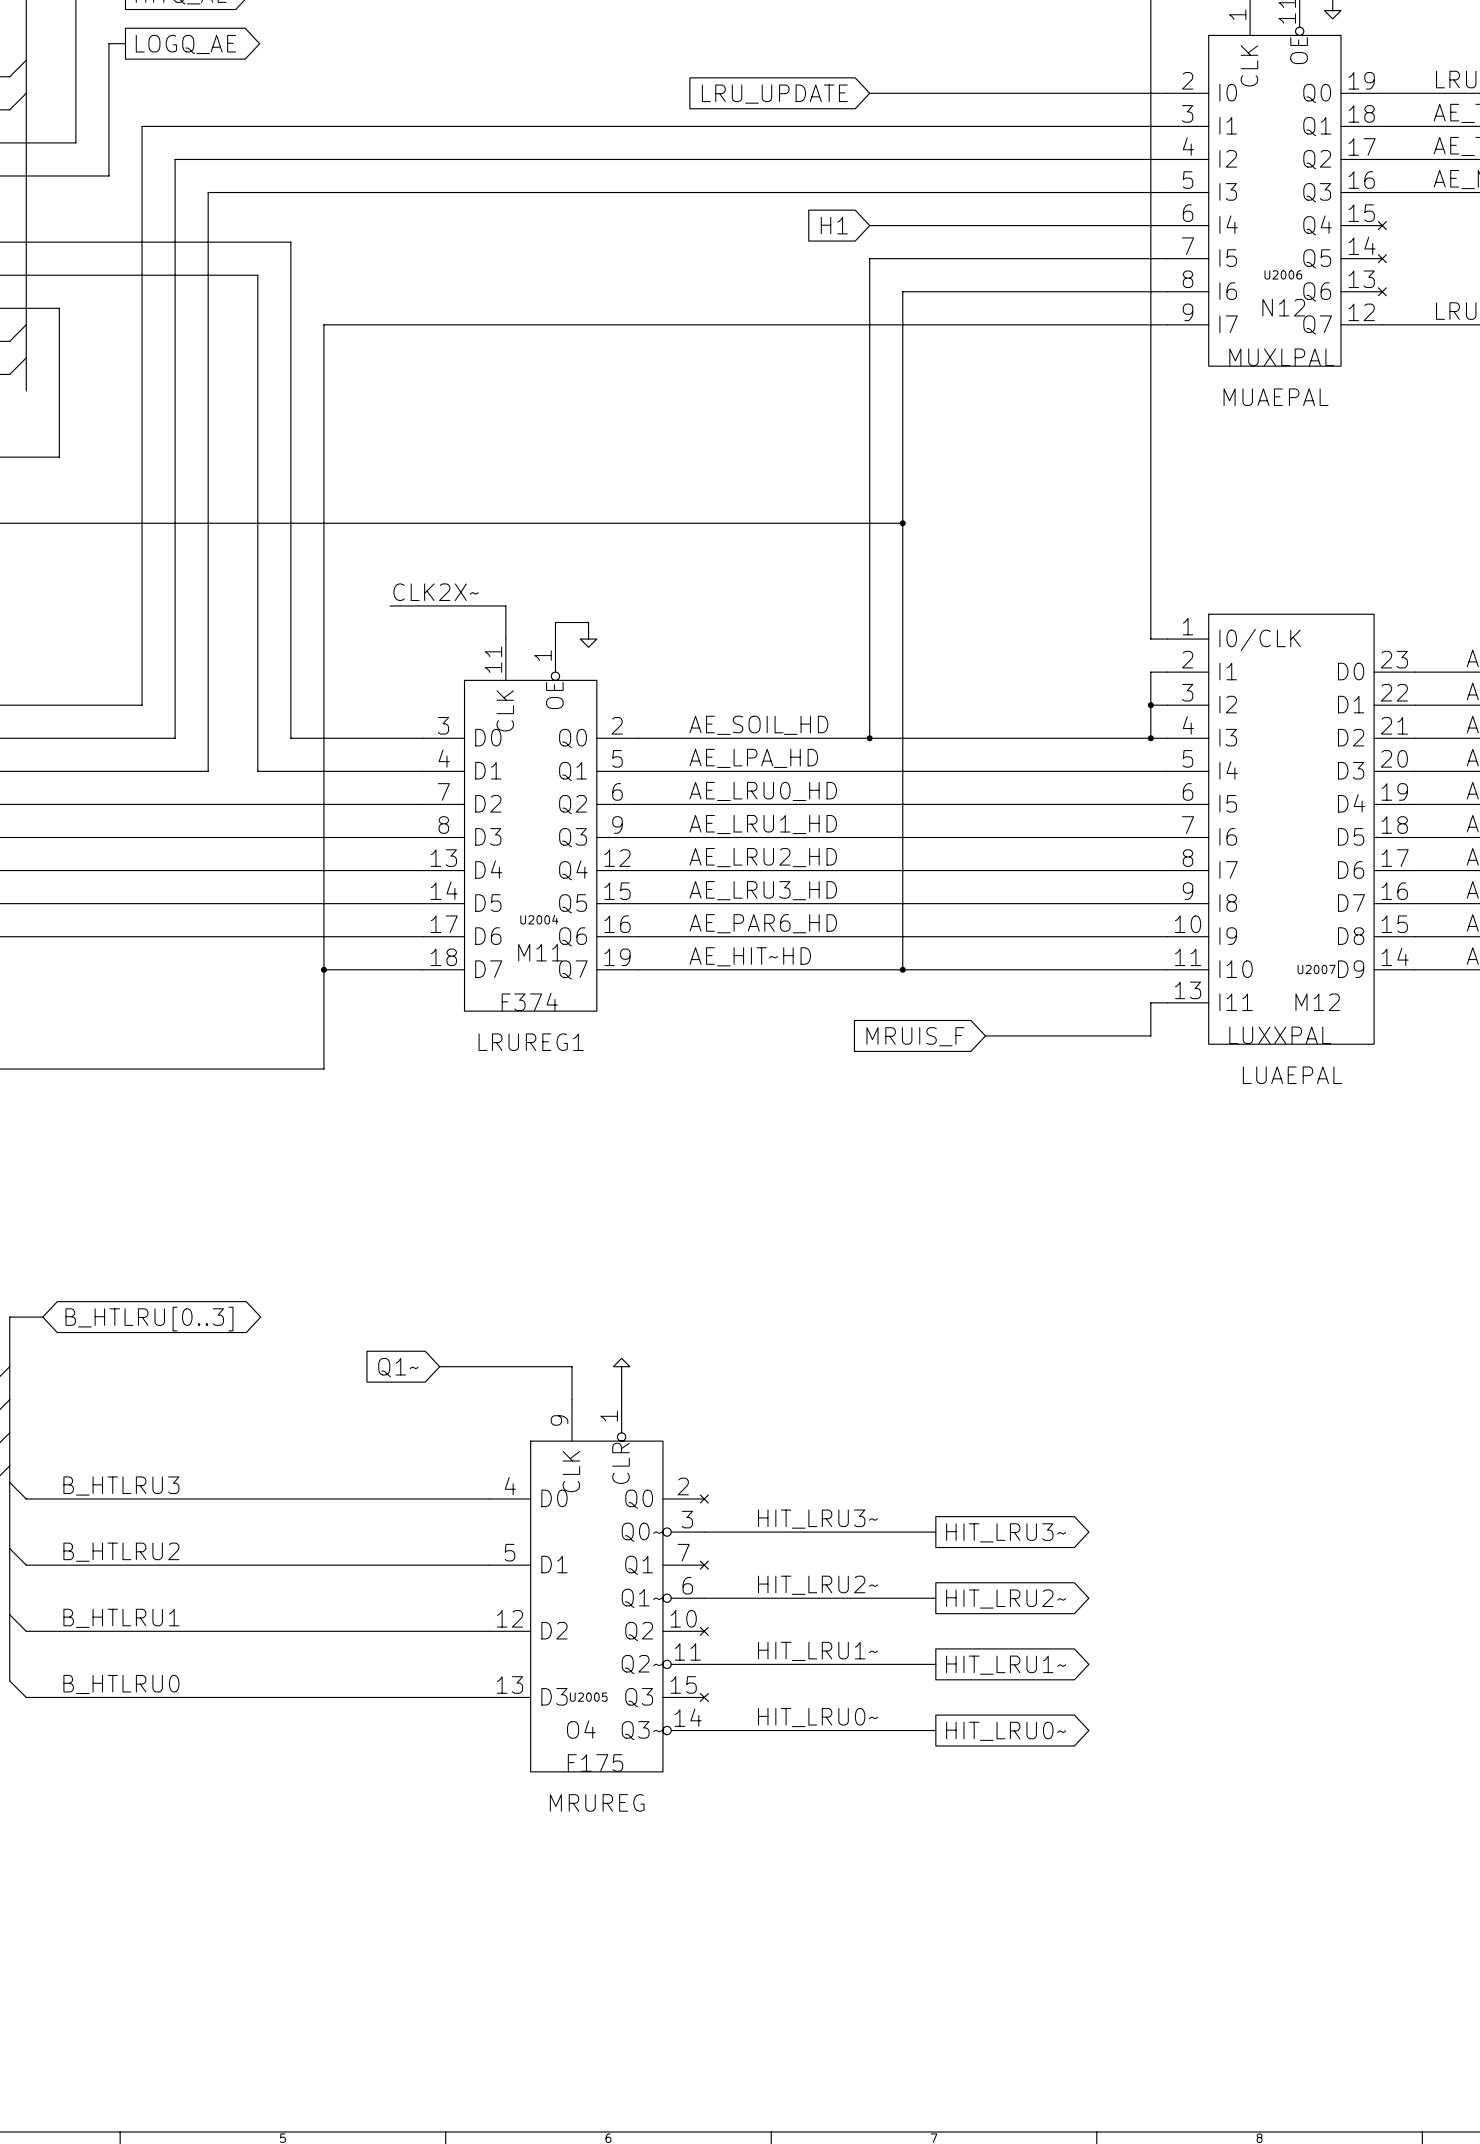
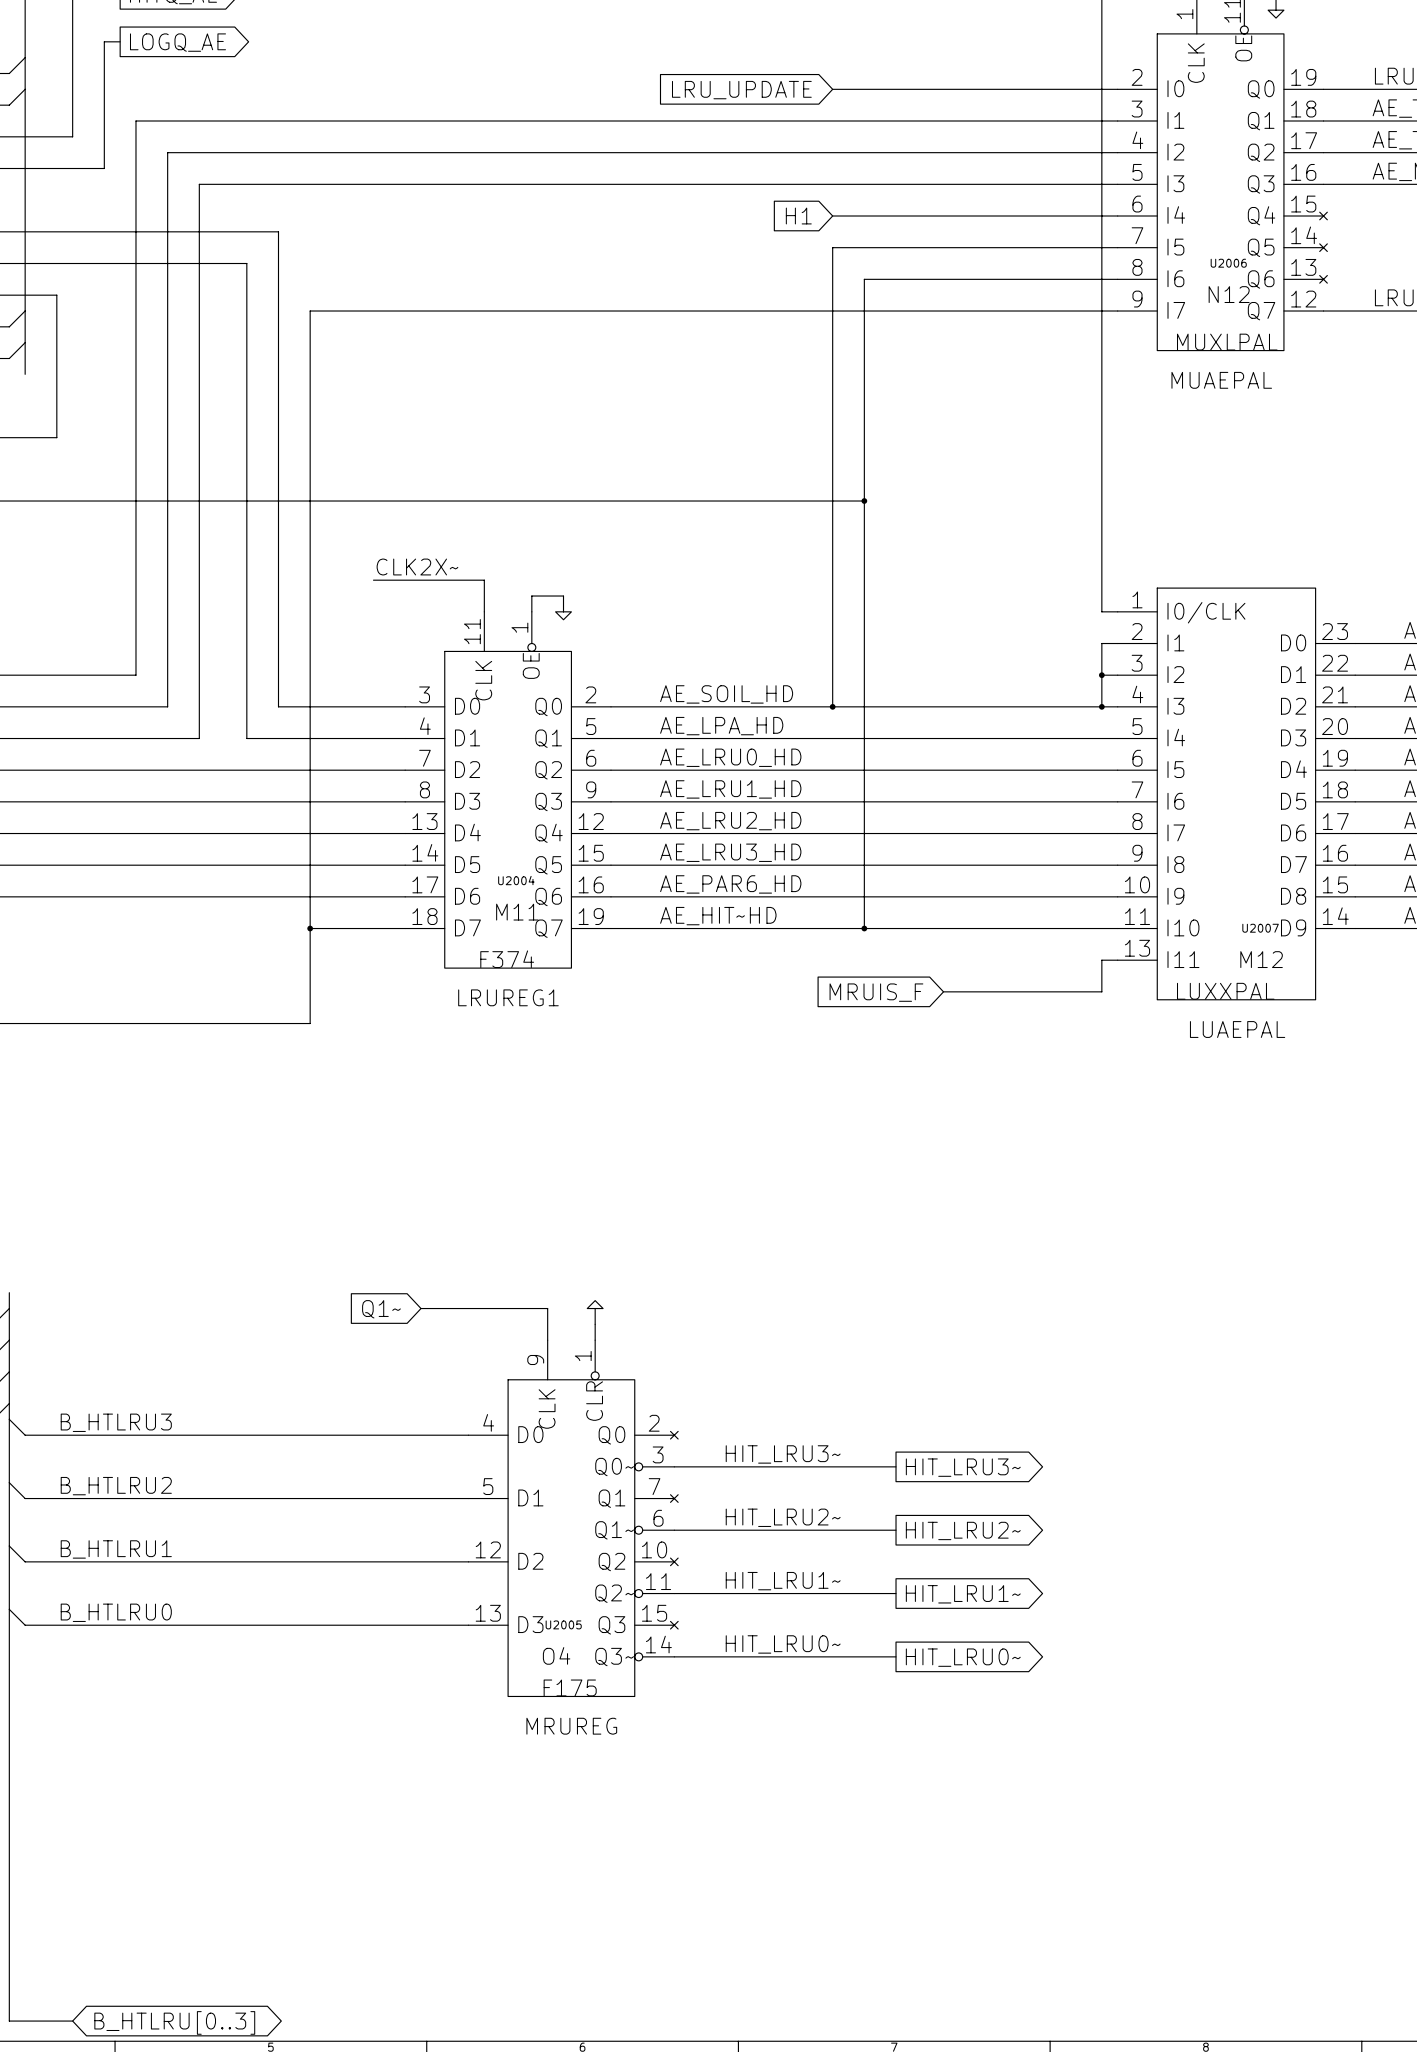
bus: (42, 1317) (9, 1317) (9, 1350) -> none
global label: B_HTLRU[0..3] (149, 1319) -> none
bus: none -> (9, 1609) (9, 2021) (72, 2021)
global label: none -> B_HTLRU[0..3] (174, 2022)

